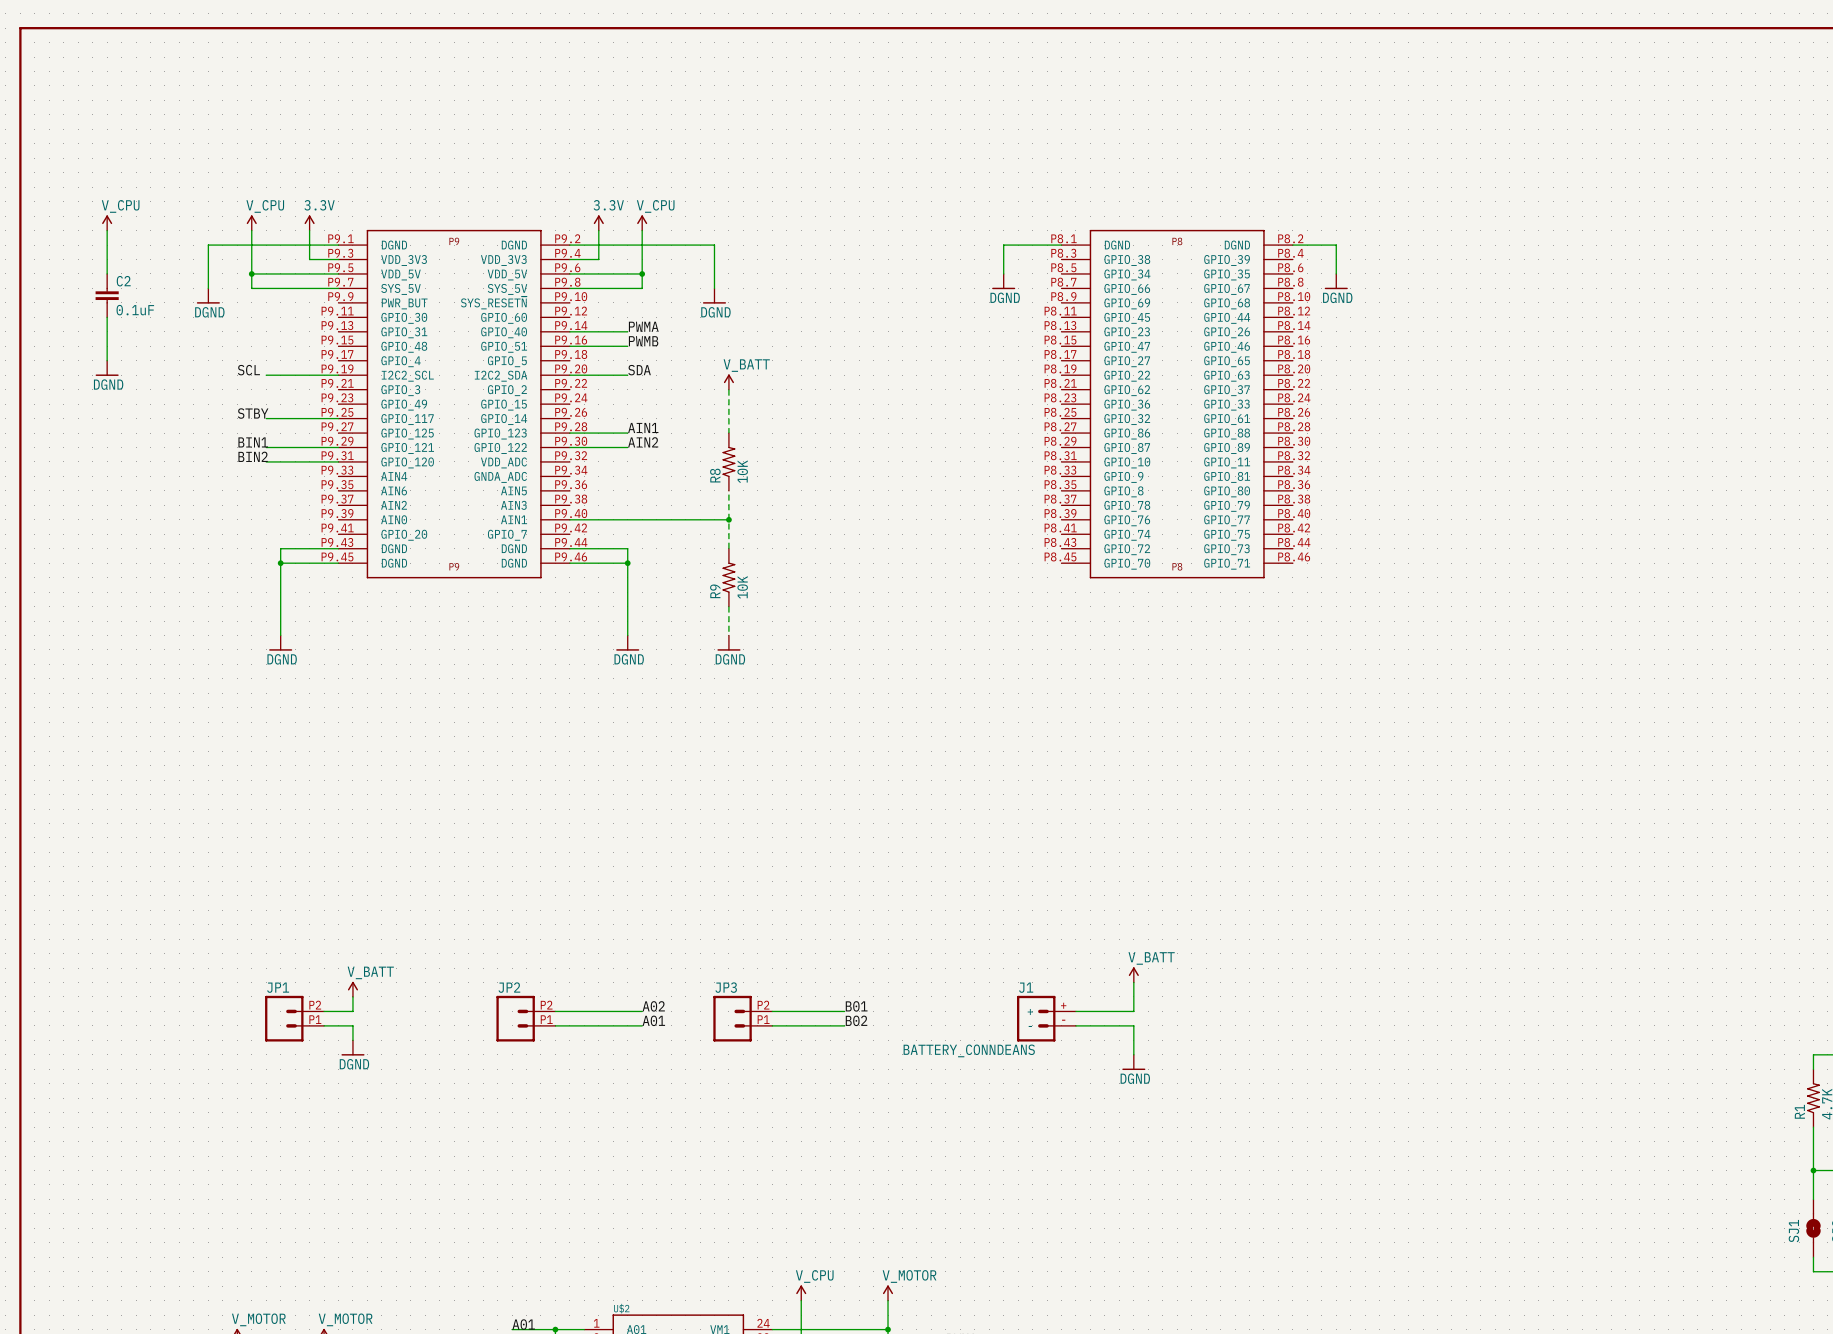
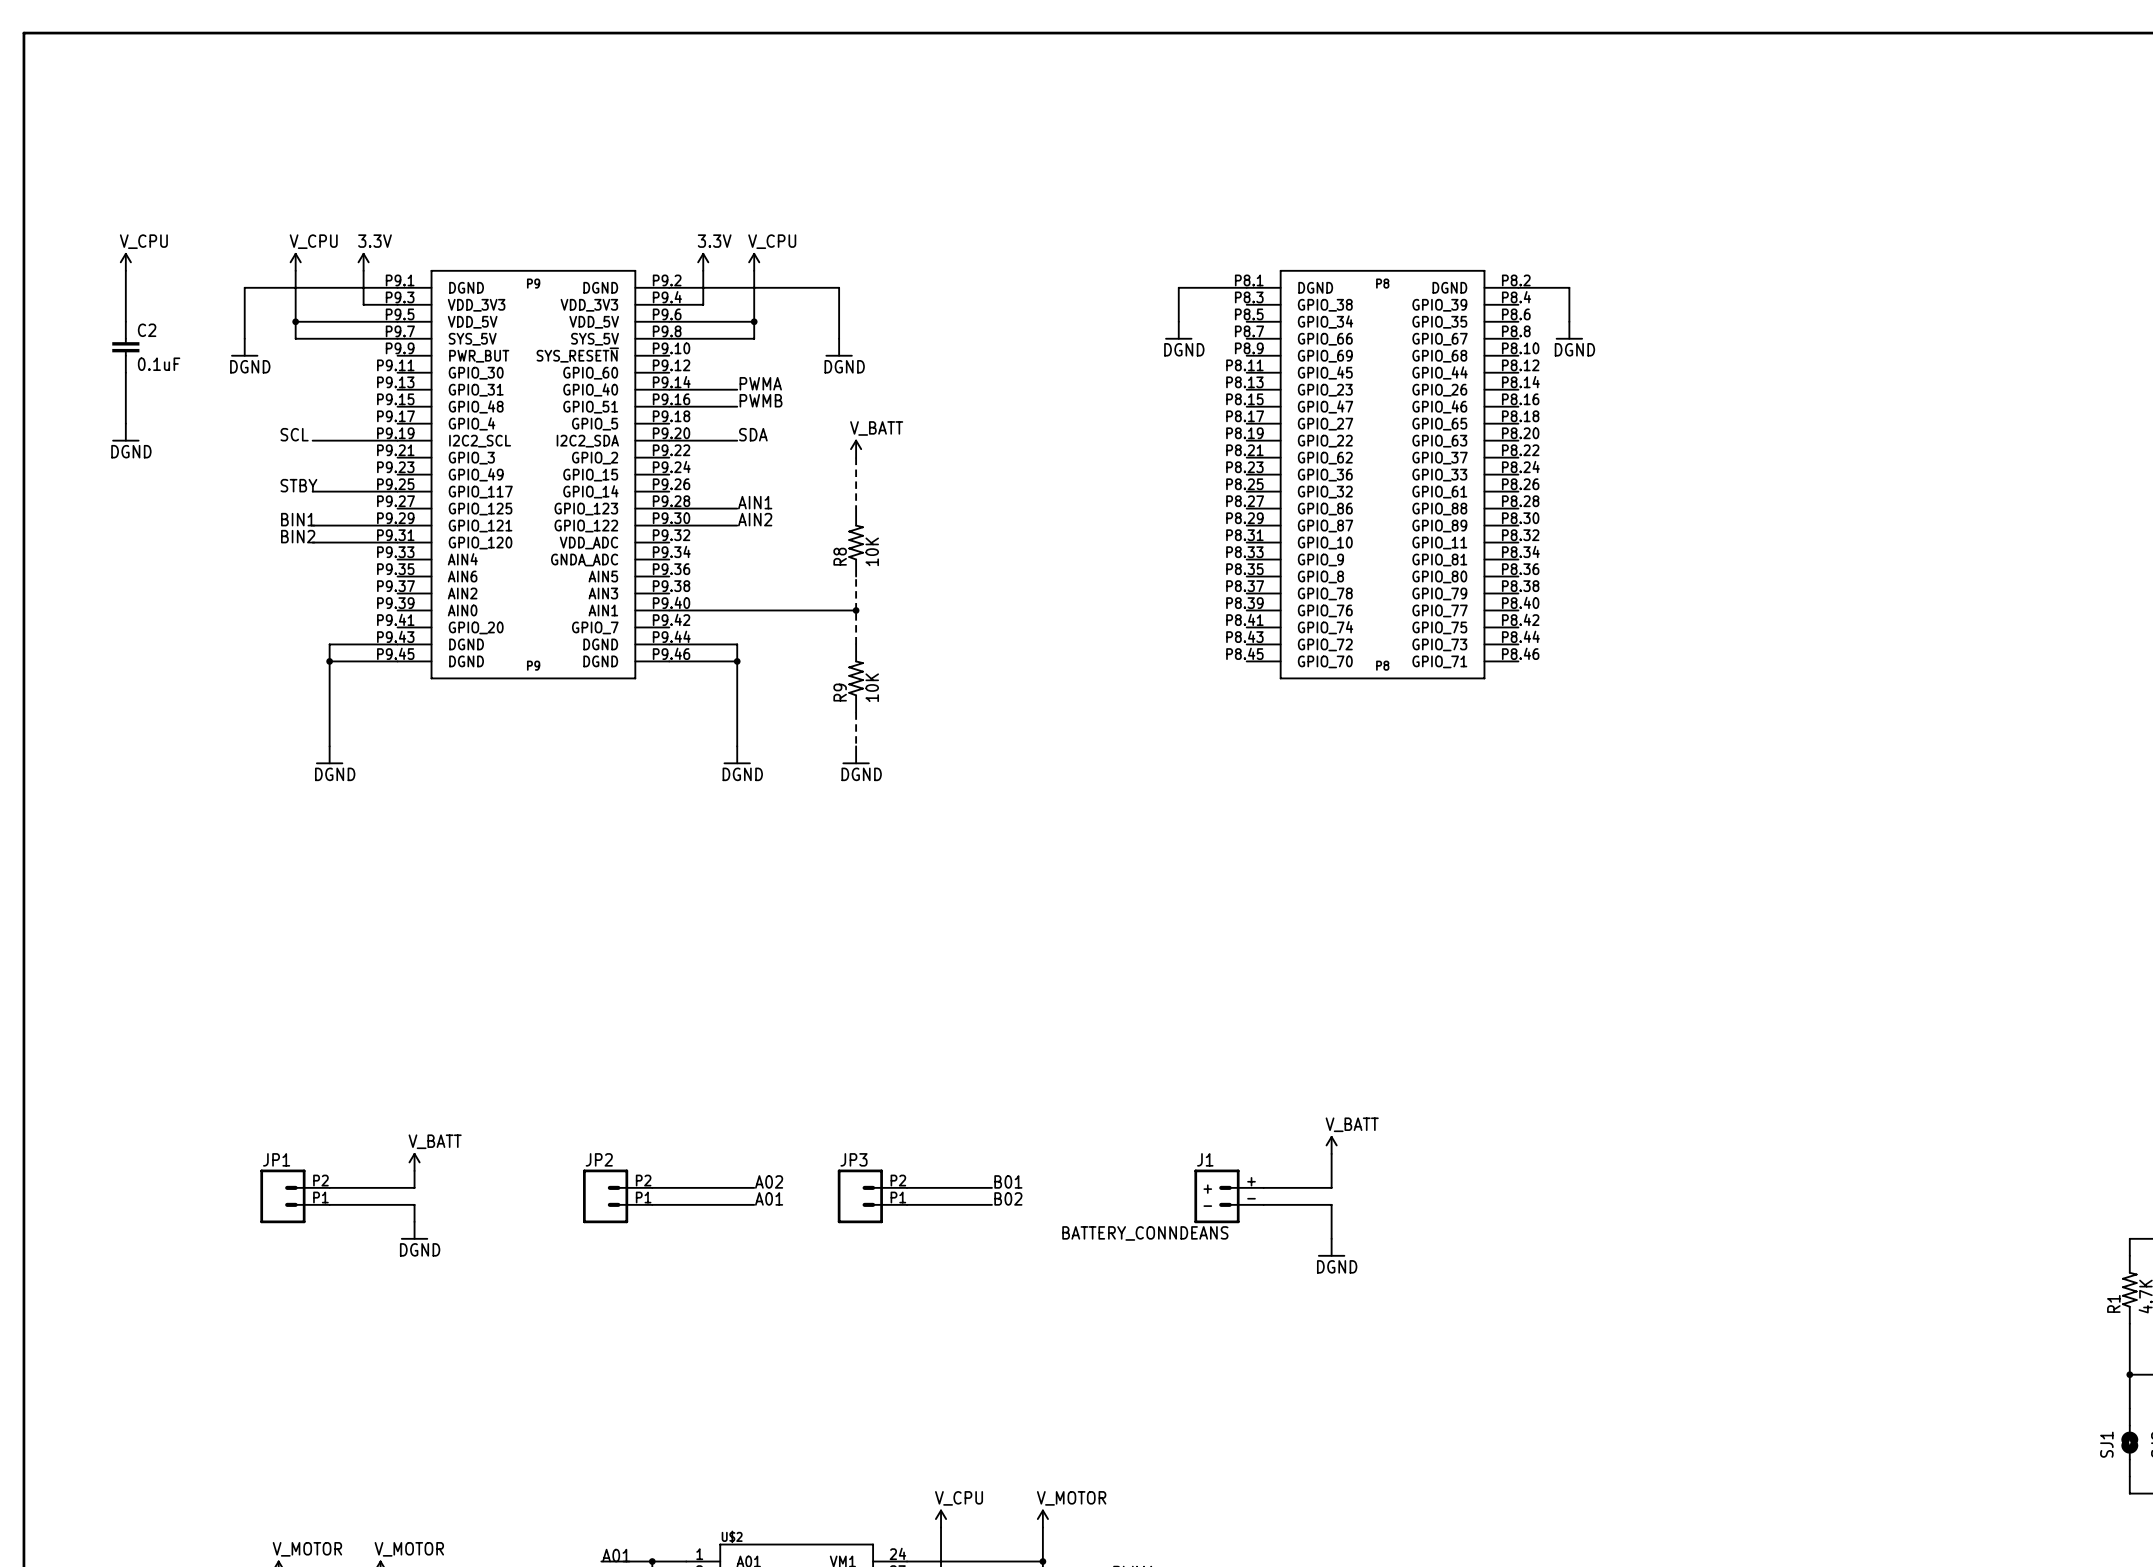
JP1 position: (294, 1018) -> (294, 1196)

